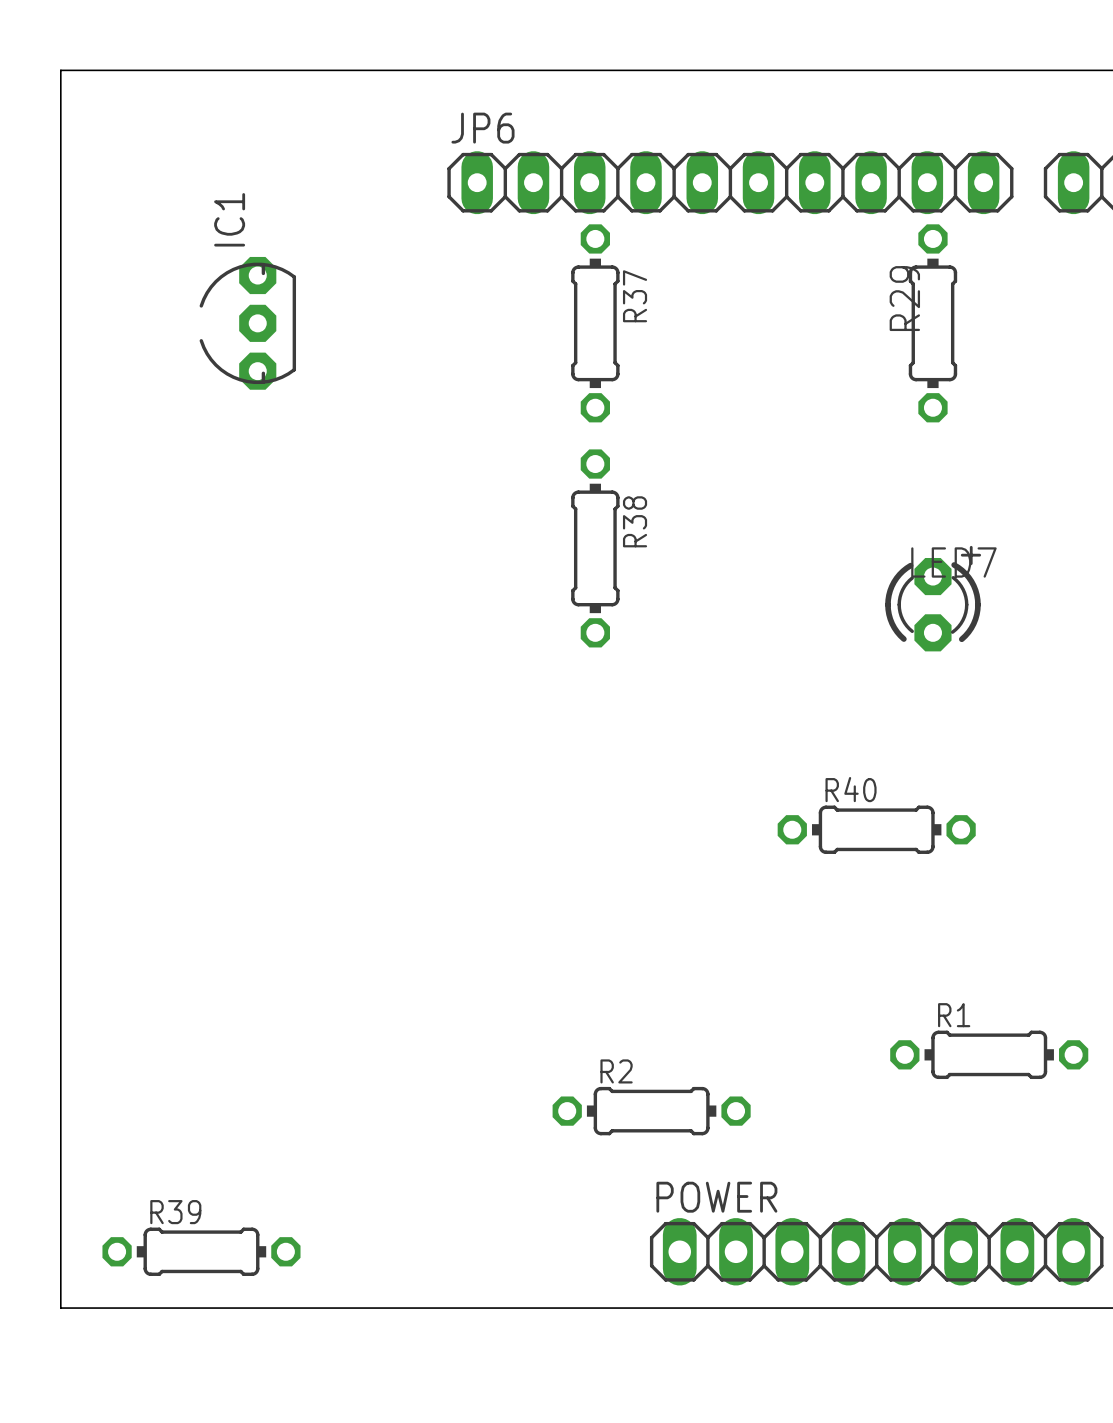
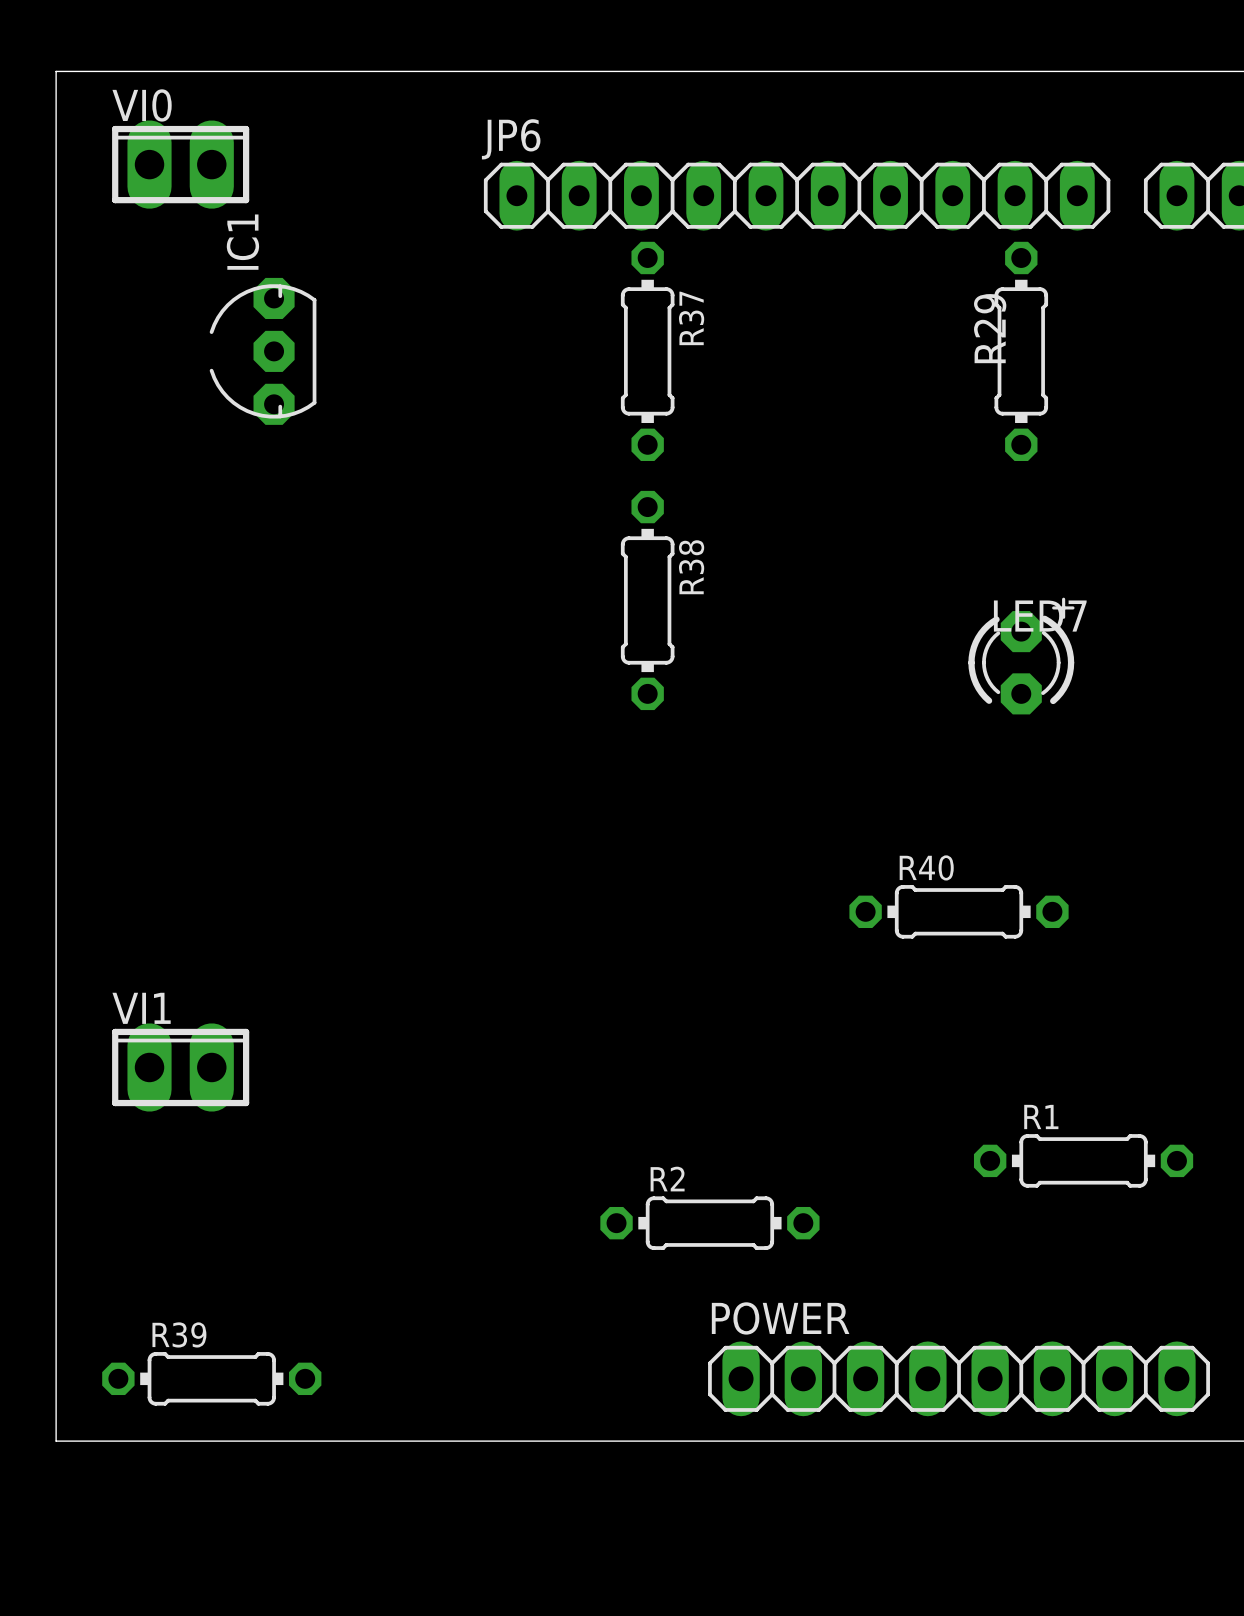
VI0: none -> (180, 164)
VI1: none -> (180, 1067)

